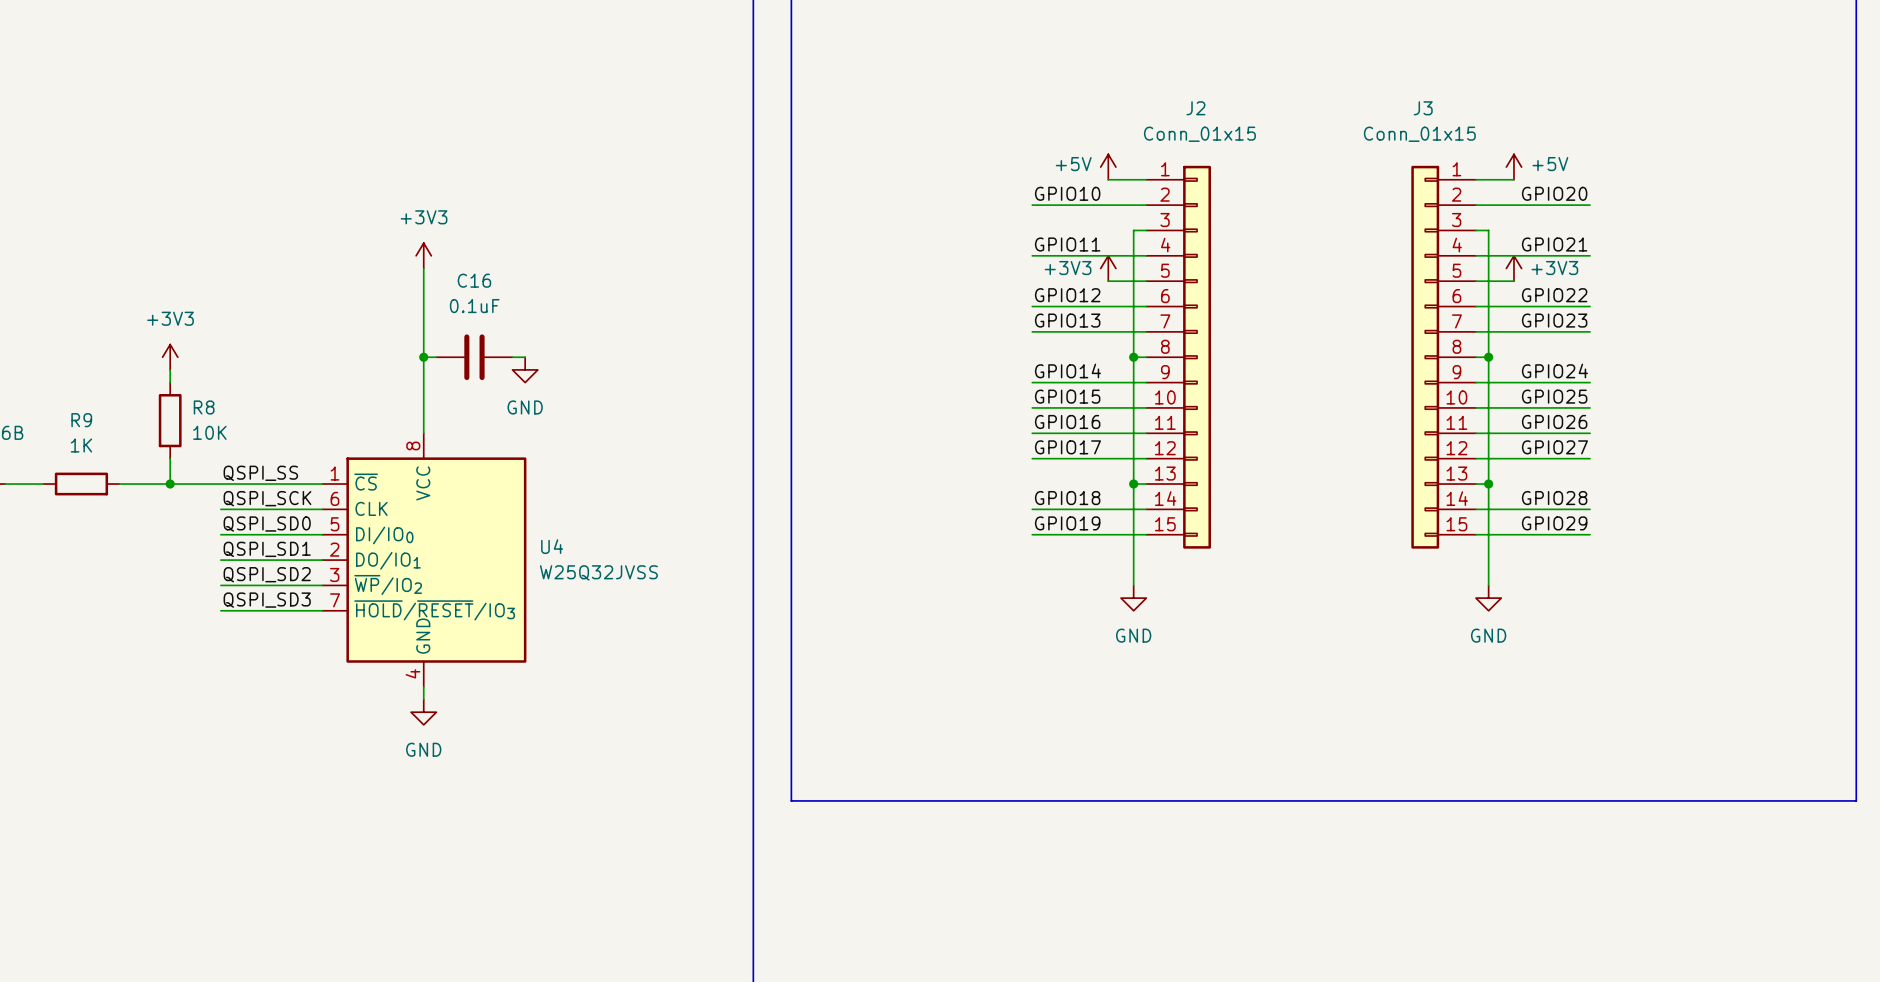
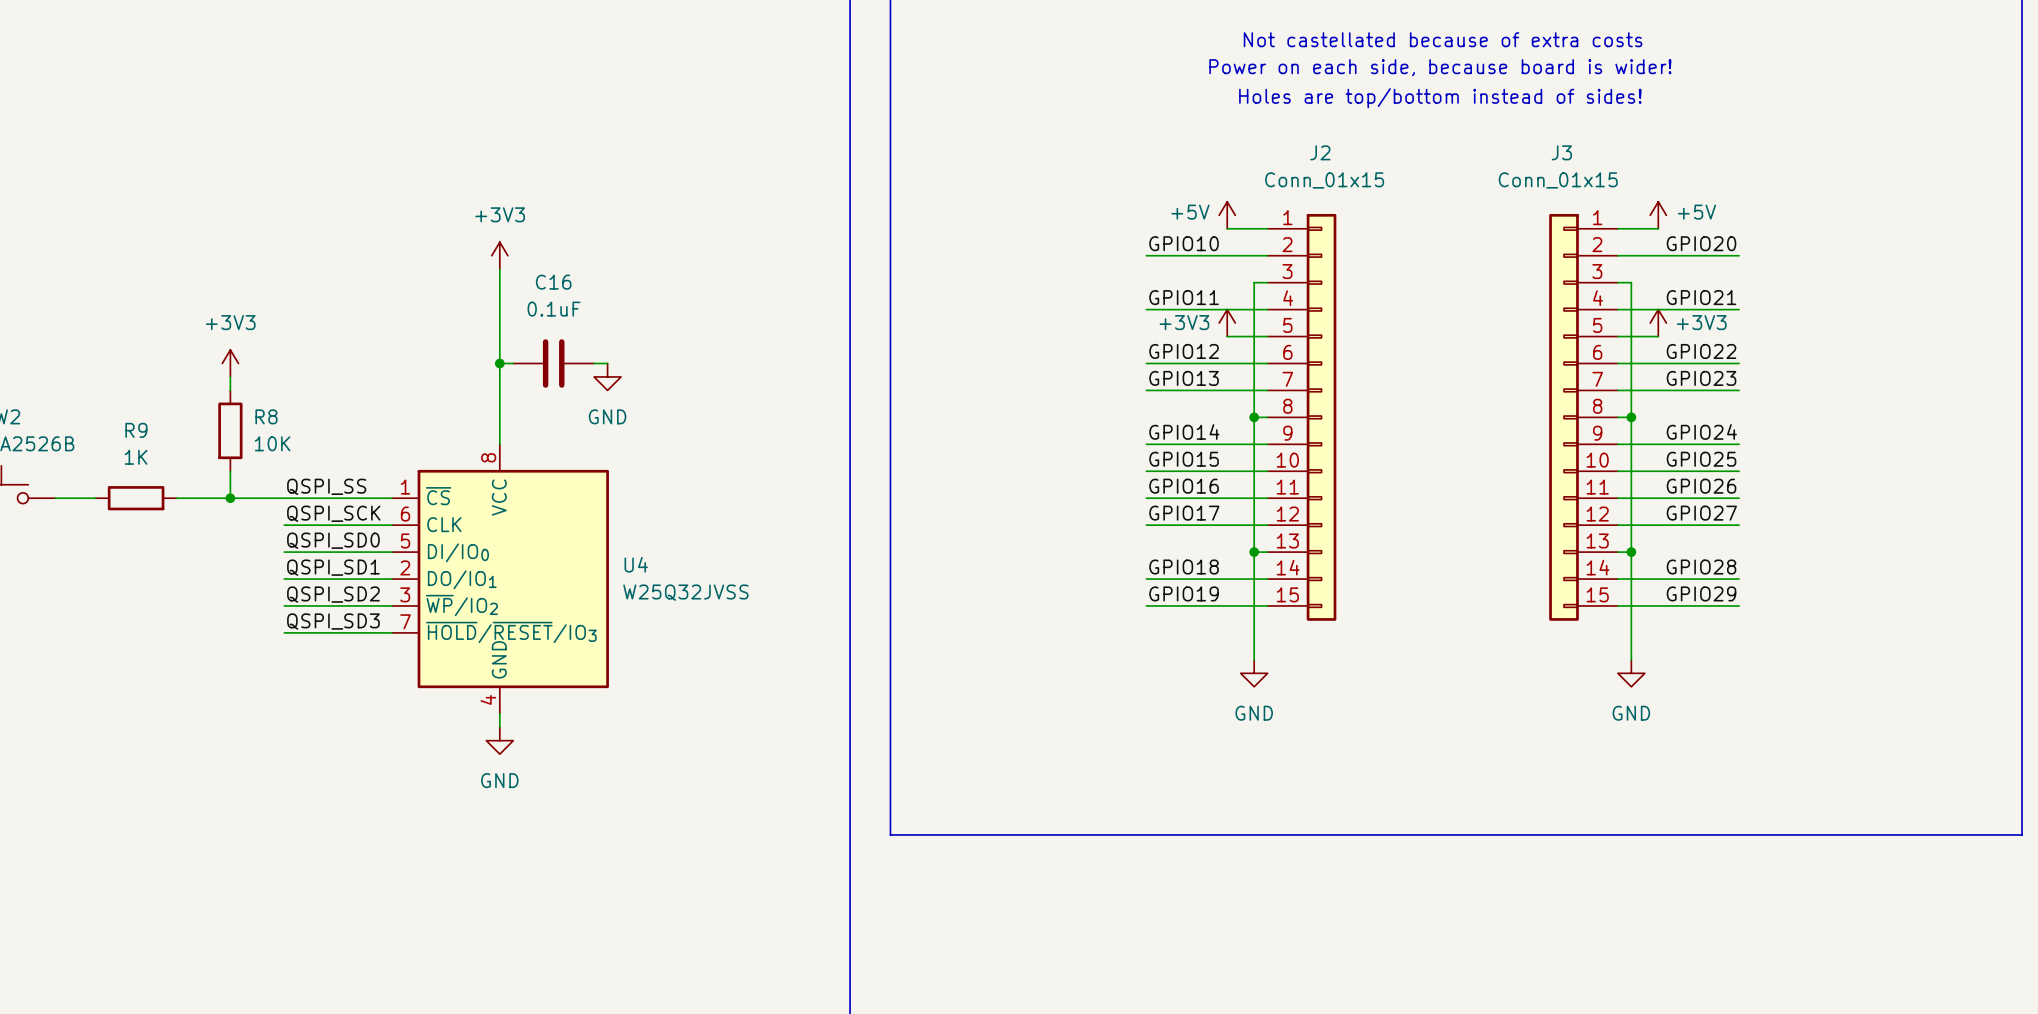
text: none -> Not castellated because of extra costs (1443, 39)
text: none -> Power on each side, because board is wider! (1440, 67)
text: none -> Holes are top/bottom instead of sides! (1440, 98)
power symbol position: +5V (1108, 167) -> +5V (1227, 215)
power symbol position: +5V (1513, 167) -> +5V (1658, 215)
wire: (1108, 179) (1146, 179) -> none
wire: (1475, 179) (1513, 179) -> none
label: GPIO10 (1067, 193) -> none
label: GPIO20 (1554, 193) -> none
wire: (1032, 205) (1146, 205) -> none
wire: (1475, 205) (1590, 205) -> none
wire: (1133, 230) (1133, 281) (1108, 281) -> (1254, 228) (1227, 228)
wire: (1488, 230) (1488, 281) (1513, 281) -> (1631, 228) (1658, 228)
label: GPIO11 (1067, 244) -> GPIO10 (1184, 243)
label: GPIO21 (1554, 244) -> GPIO20 (1701, 243)
power symbol position: +3V3 (1108, 268) -> +3V3 (1227, 323)
power symbol position: +3V3 (1513, 268) -> +3V3 (1658, 323)
label: GPIO12 (1067, 295) -> GPIO11 (1184, 297)
label: GPIO22 (1554, 295) -> GPIO21 (1701, 297)
label: GPIO13 (1067, 320) -> GPIO12 (1184, 351)
label: GPIO23 (1554, 320) -> GPIO22 (1701, 351)
wire: (1032, 331) (1108, 331) -> none
wire: (1513, 331) (1590, 331) -> none
junction: (1133, 357) -> none
J2 position: (1178, 357) -> (1302, 417)
J3 position: (1443, 357) -> (1583, 417)
junction: (1488, 357) -> none
label: GPIO14 (1067, 370) -> GPIO13 (1184, 378)
label: GPIO24 (1554, 370) -> GPIO23 (1701, 378)
label: GPIO15 (1067, 396) -> none
label: GPIO25 (1554, 396) -> none
wire: (1032, 407) (1133, 407) -> (1146, 363) (1254, 363)
junction: none -> (1254, 417)
wire: (1488, 407) (1590, 407) -> (1631, 363) (1739, 363)
junction: none -> (1631, 417)
label: GPIO16 (1067, 421) -> GPIO14 (1184, 431)
label: GPIO26 (1554, 421) -> GPIO24 (1701, 431)
label: GPIO17 (1067, 447) -> GPIO15 (1184, 459)
label: GPIO27 (1554, 447) -> GPIO25 (1701, 459)
label: none -> GPIO16 (1184, 486)
label: none -> GPIO26 (1701, 486)
junction: (1133, 484) -> none
junction: (1488, 484) -> none
label: GPIO18 (1067, 498) -> GPIO17 (1184, 513)
label: GPIO28 (1554, 498) -> GPIO27 (1701, 513)
label position: GPIO19 (1067, 523) -> GPIO19 (1184, 593)
label position: GPIO29 (1554, 523) -> GPIO29 (1701, 593)
wire: (1032, 534) (1133, 534) -> (1146, 498) (1254, 498)
junction: none -> (1254, 552)
wire: (1488, 534) (1590, 534) -> (1631, 498) (1739, 498)
junction: none -> (1631, 552)
label: none -> GPIO18 (1184, 567)
label: none -> GPIO28 (1701, 567)
wire: none -> (1146, 579) (1267, 579)
wire: none -> (1617, 579) (1739, 579)
wire: none -> (1146, 605) (1267, 605)
wire: none -> (1254, 605) (1254, 659)
wire: none -> (1617, 605) (1739, 605)
wire: none -> (1631, 605) (1631, 659)
power symbol position: GND (1133, 598) -> GND (1254, 673)
power symbol position: GND (1488, 598) -> GND (1631, 673)

